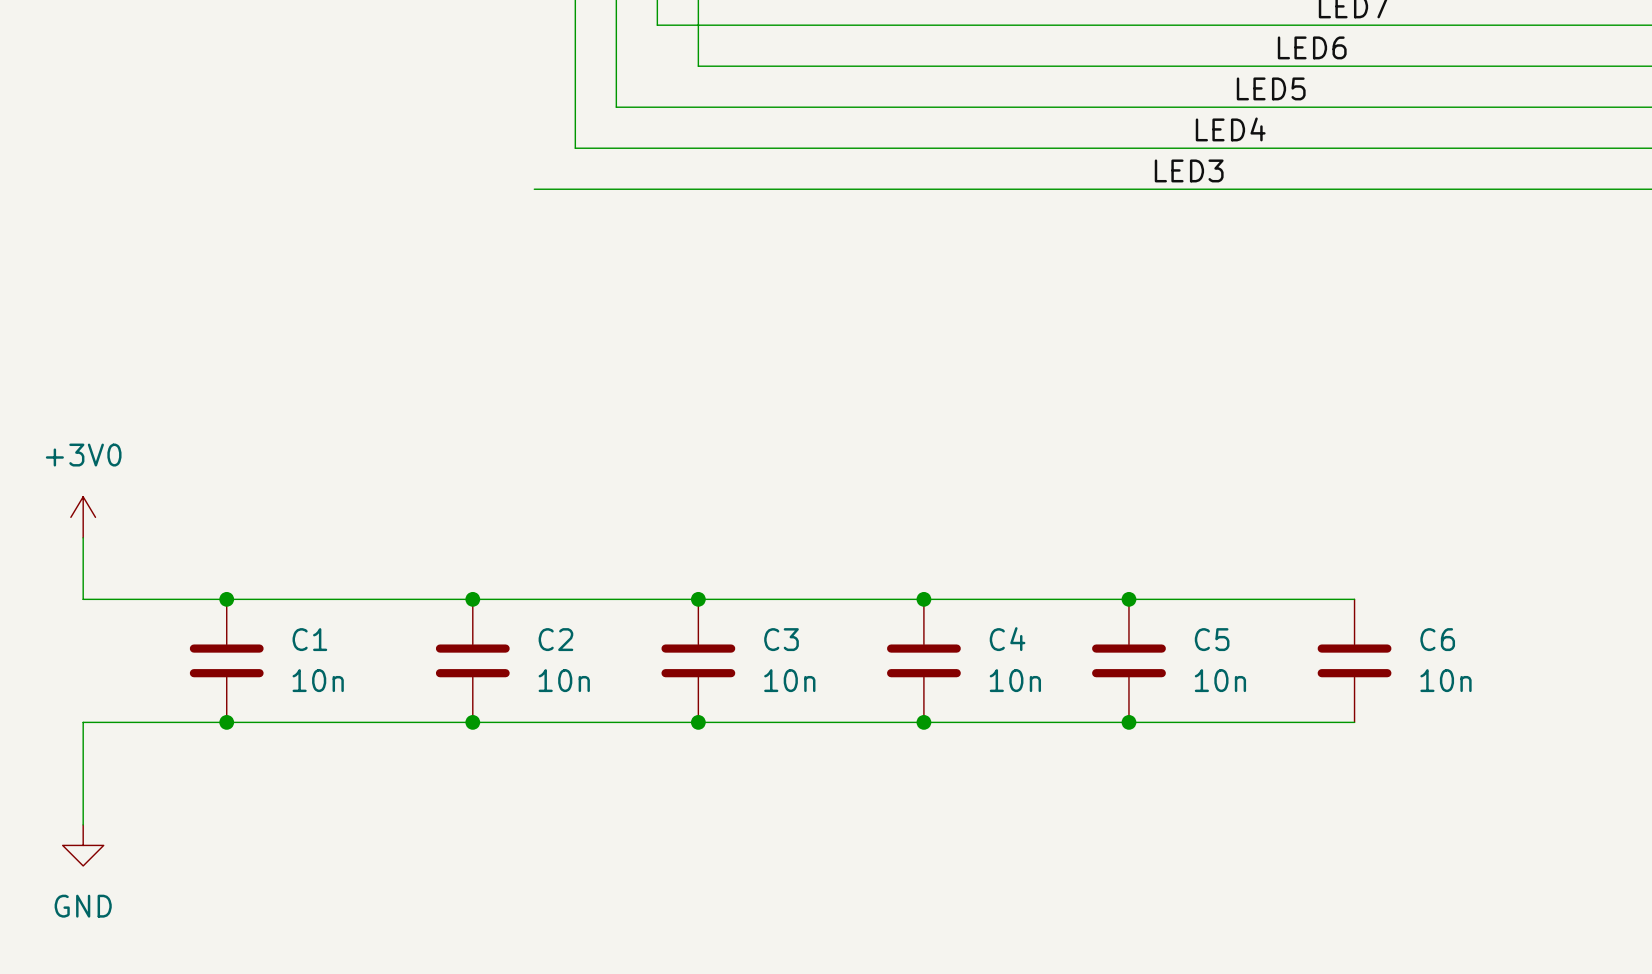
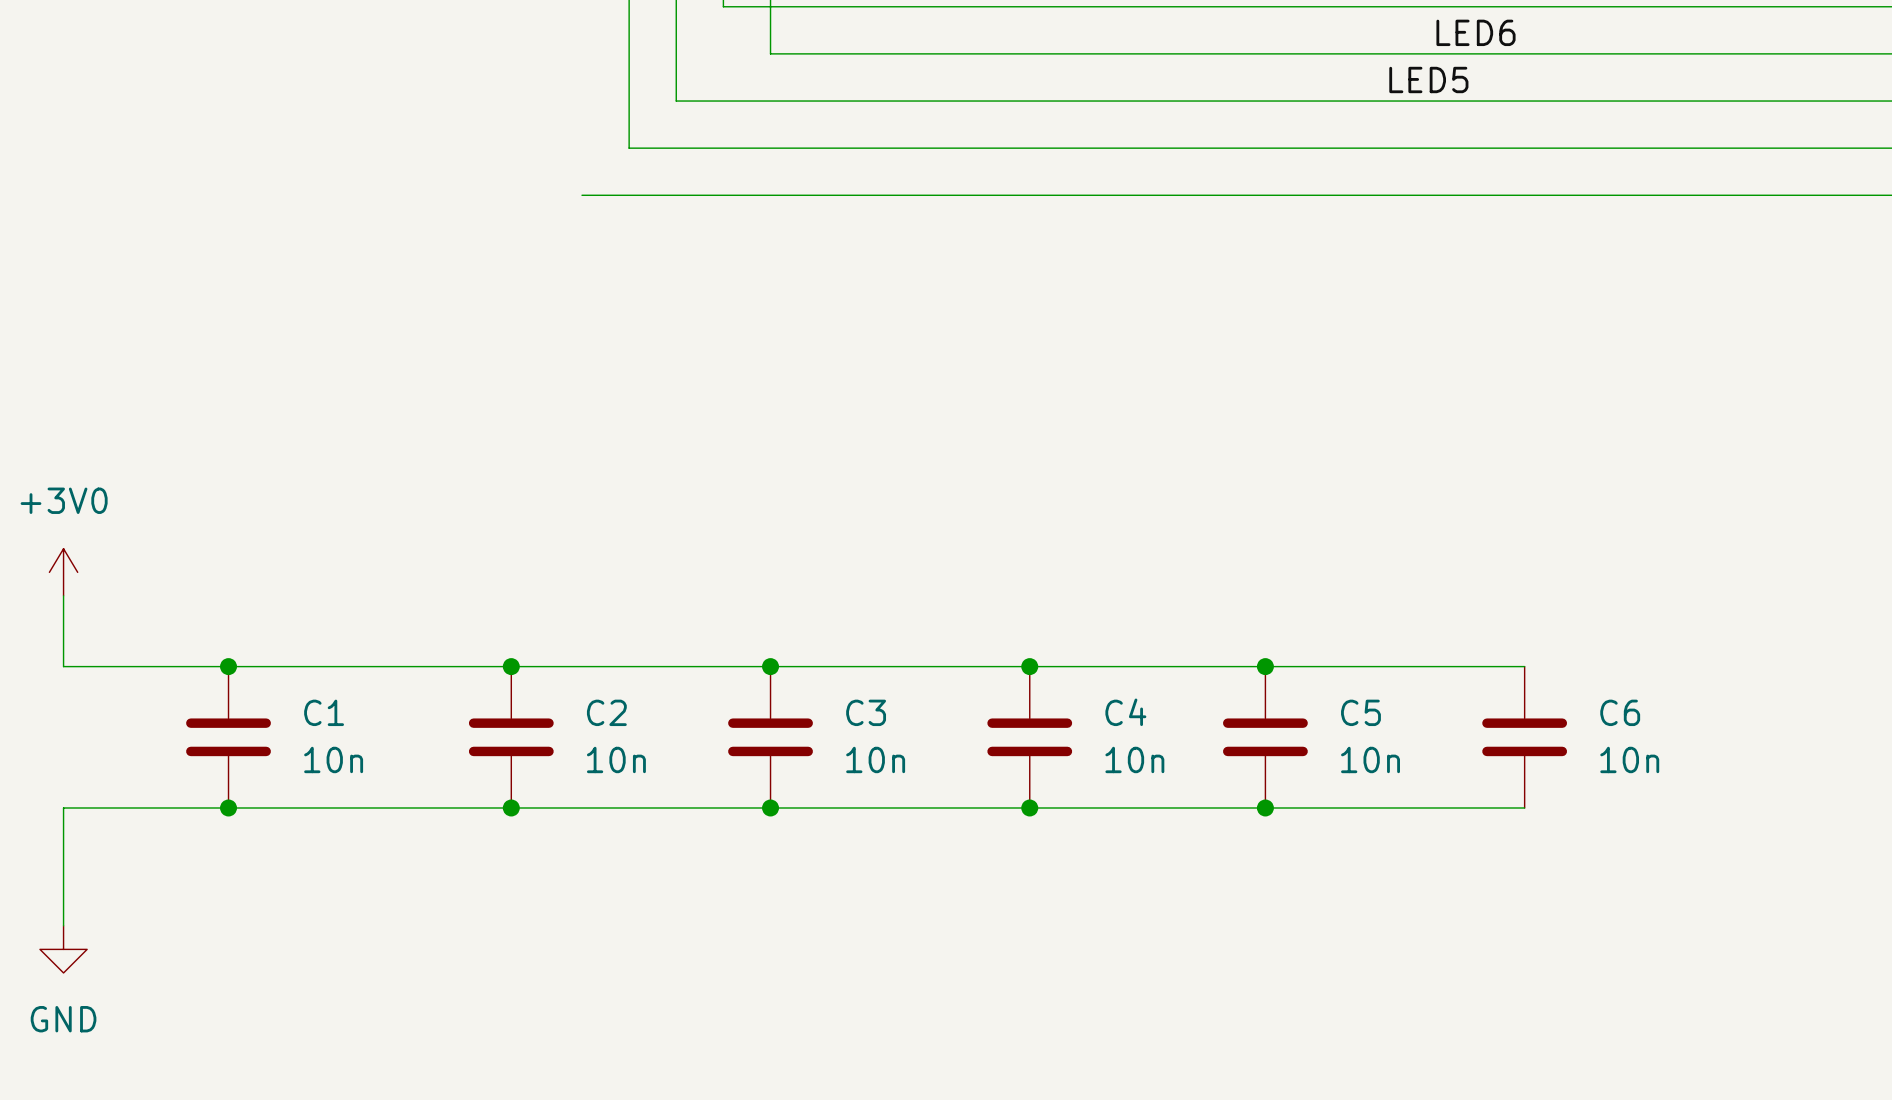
label: LED4 (1230, 129) -> none
label: LED3 (1189, 170) -> none

